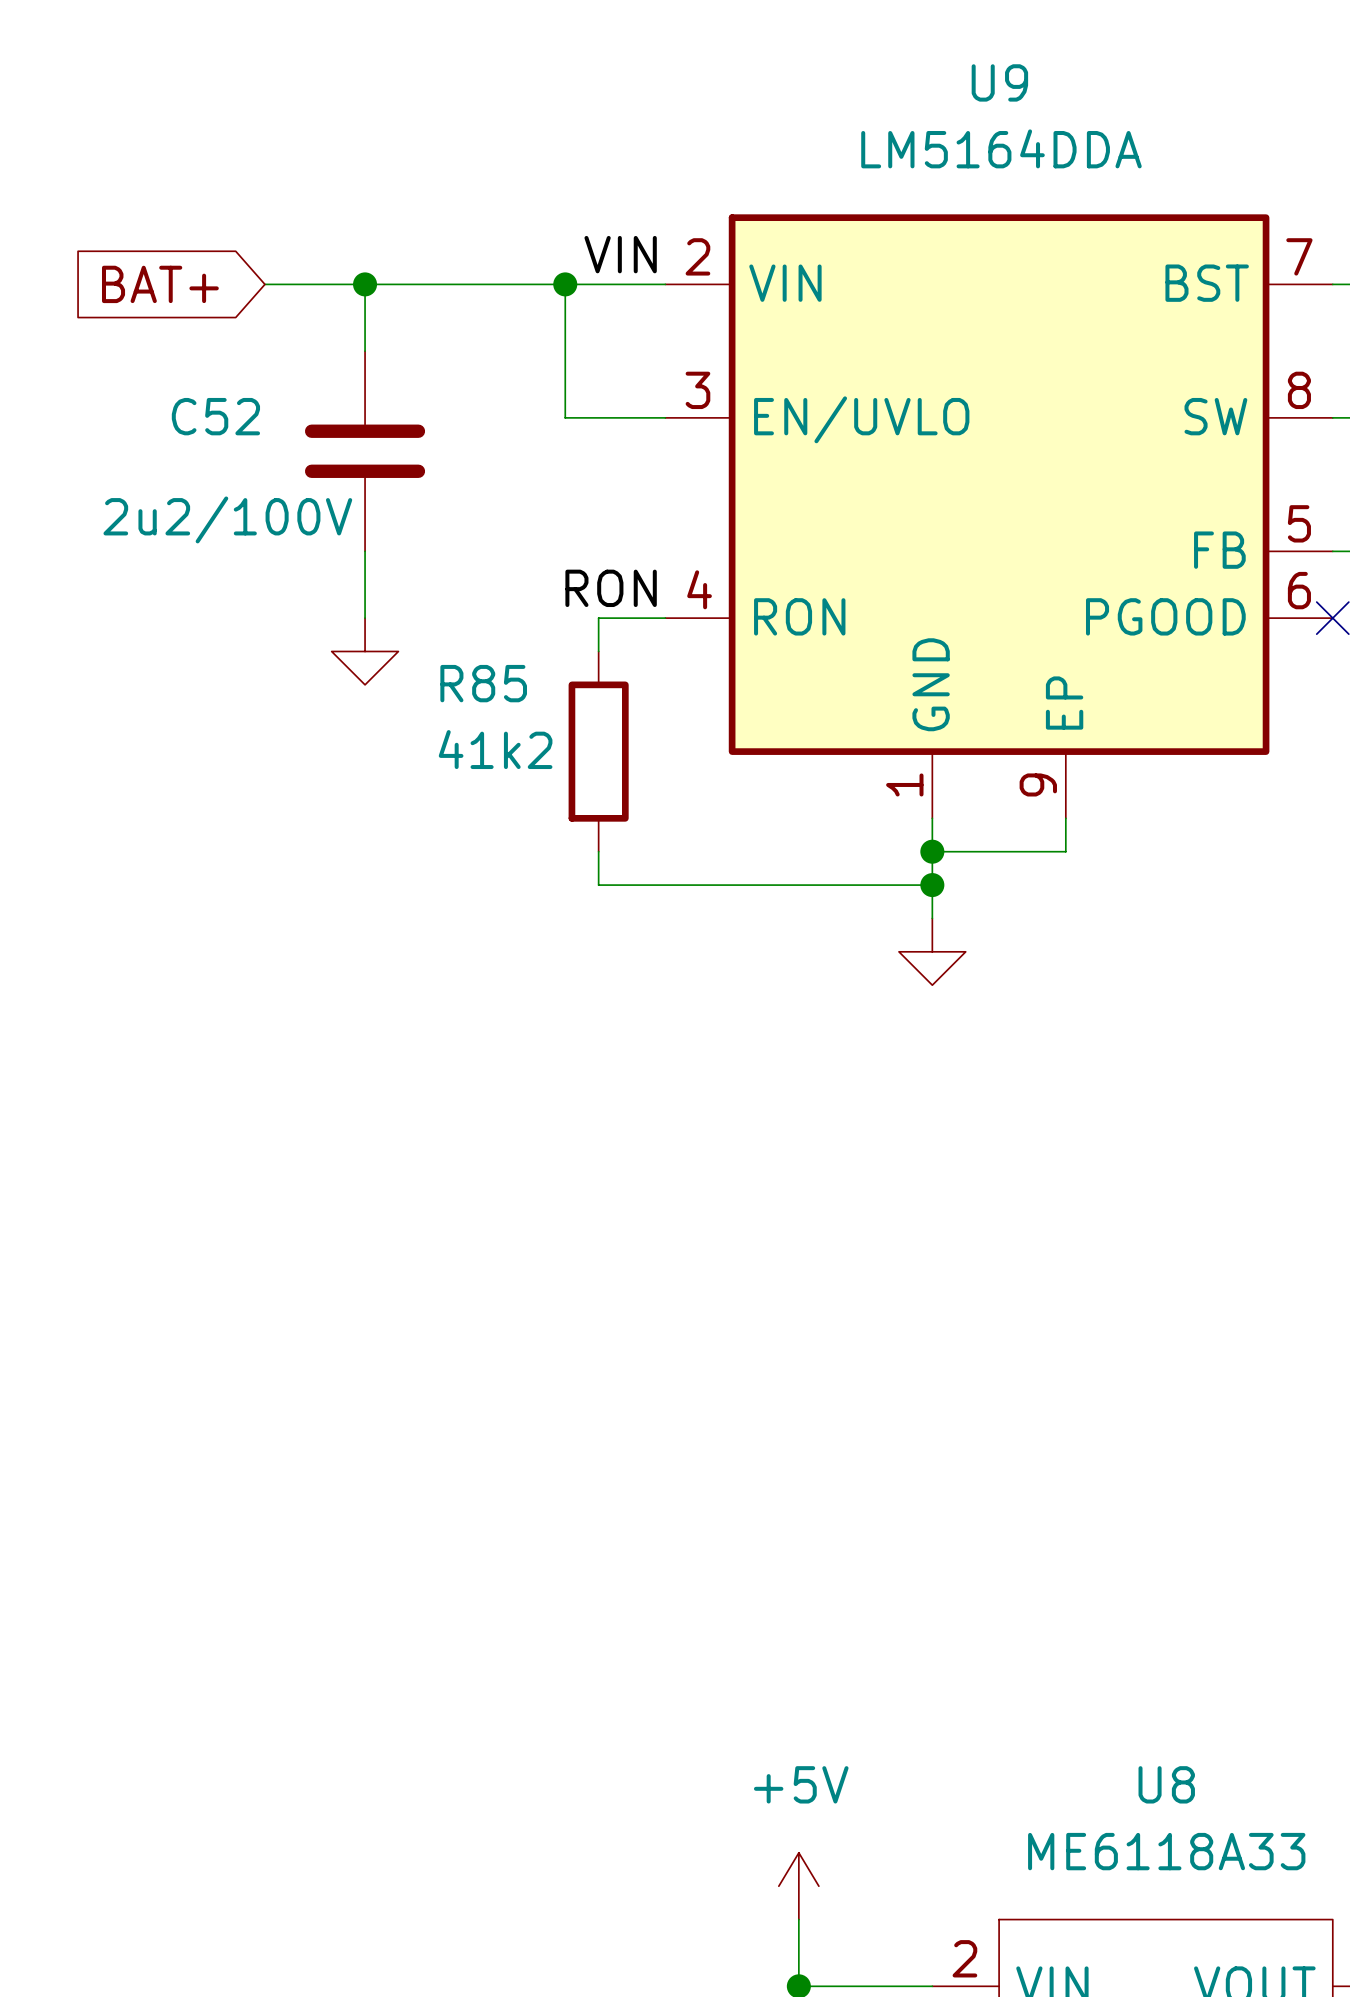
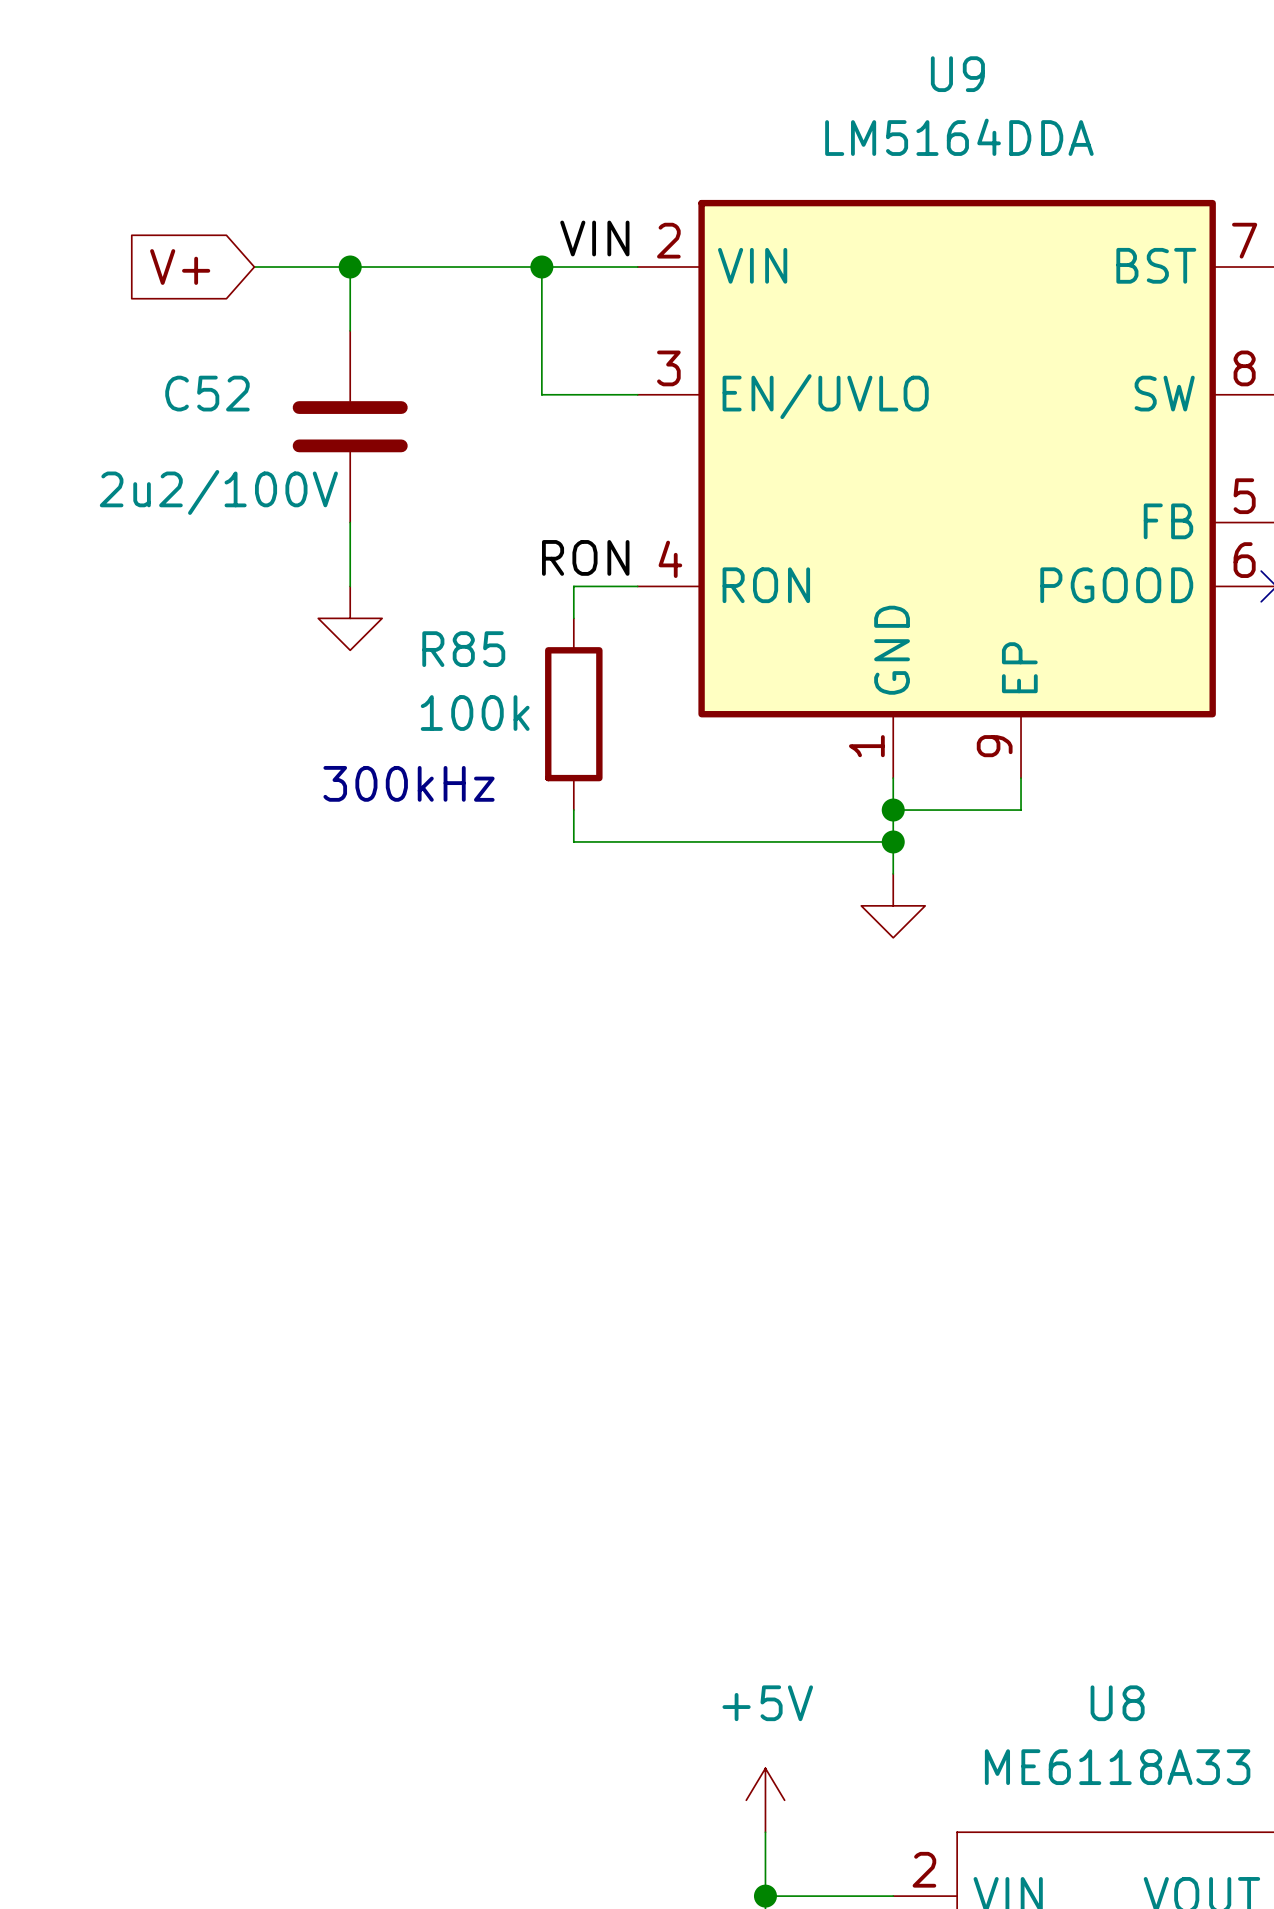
global label: BAT+ (160, 284) -> V+ (180, 267)
R85 value: 41k2 (495, 749) -> 100k (475, 713)
text: none -> 300kHz (409, 783)

